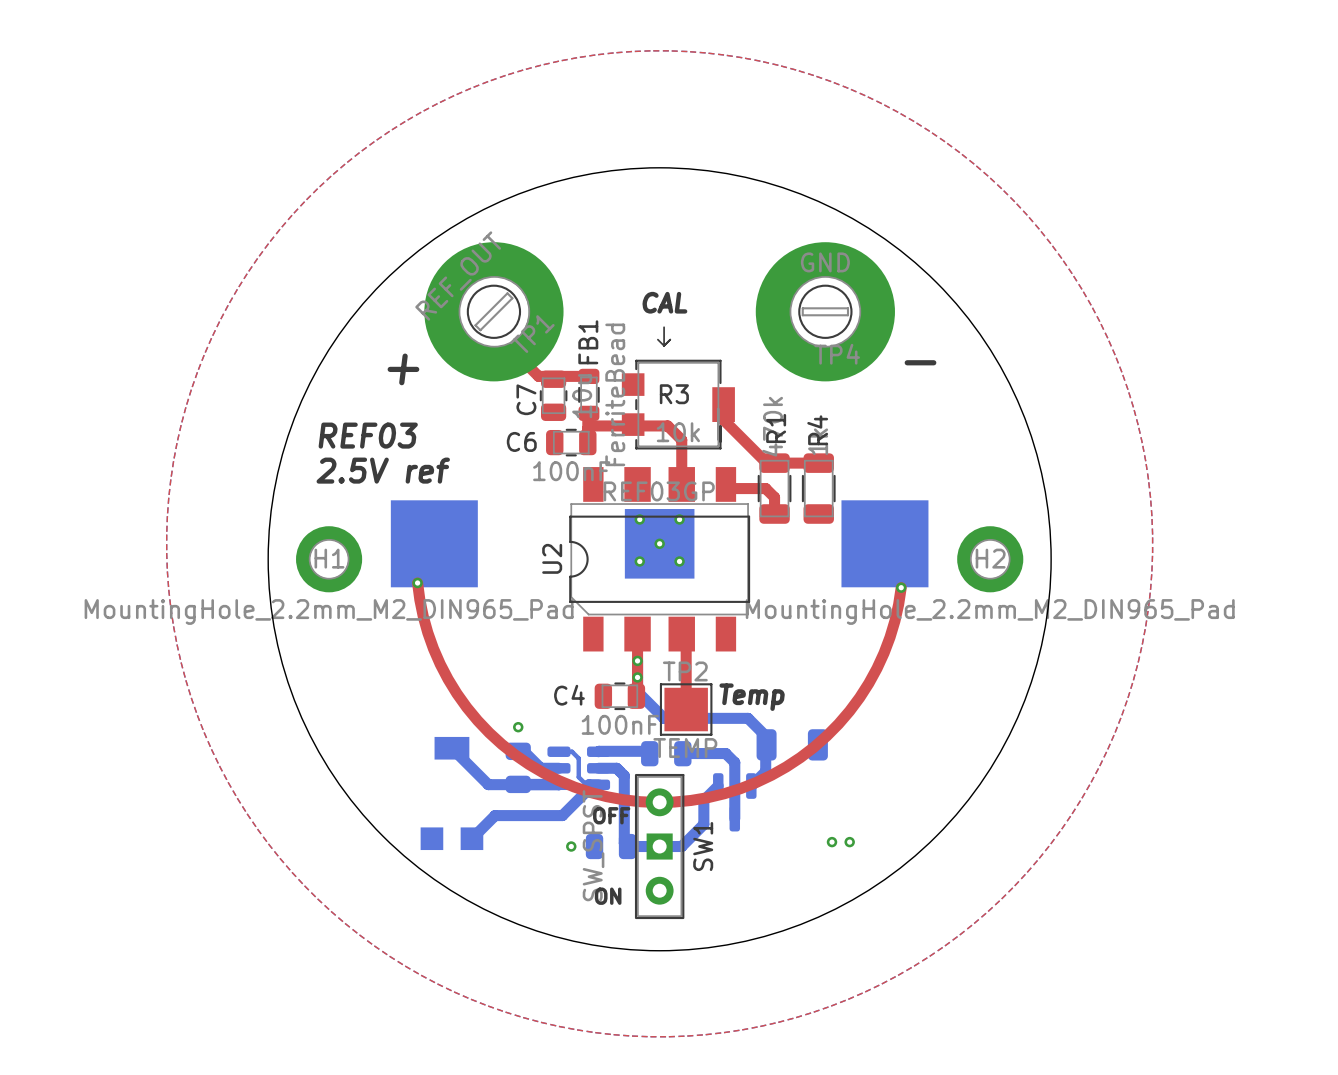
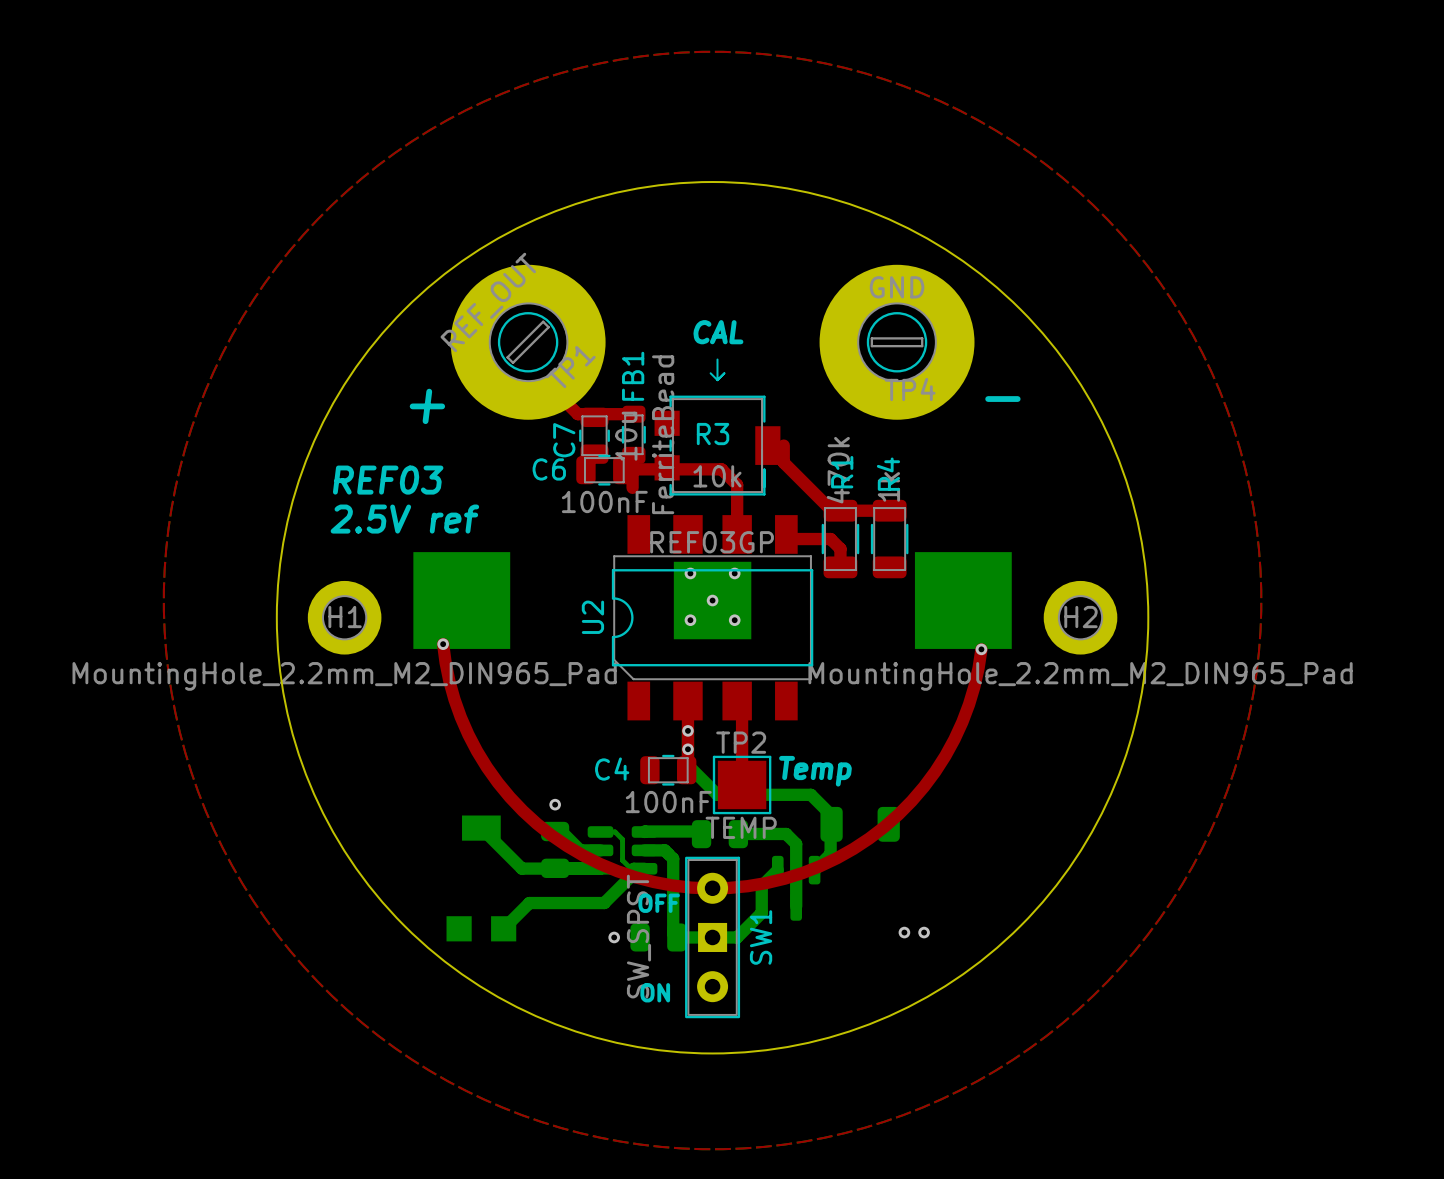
R3 position: (678, 404) -> (717, 445)
C6 position: (571, 442) -> (604, 470)

